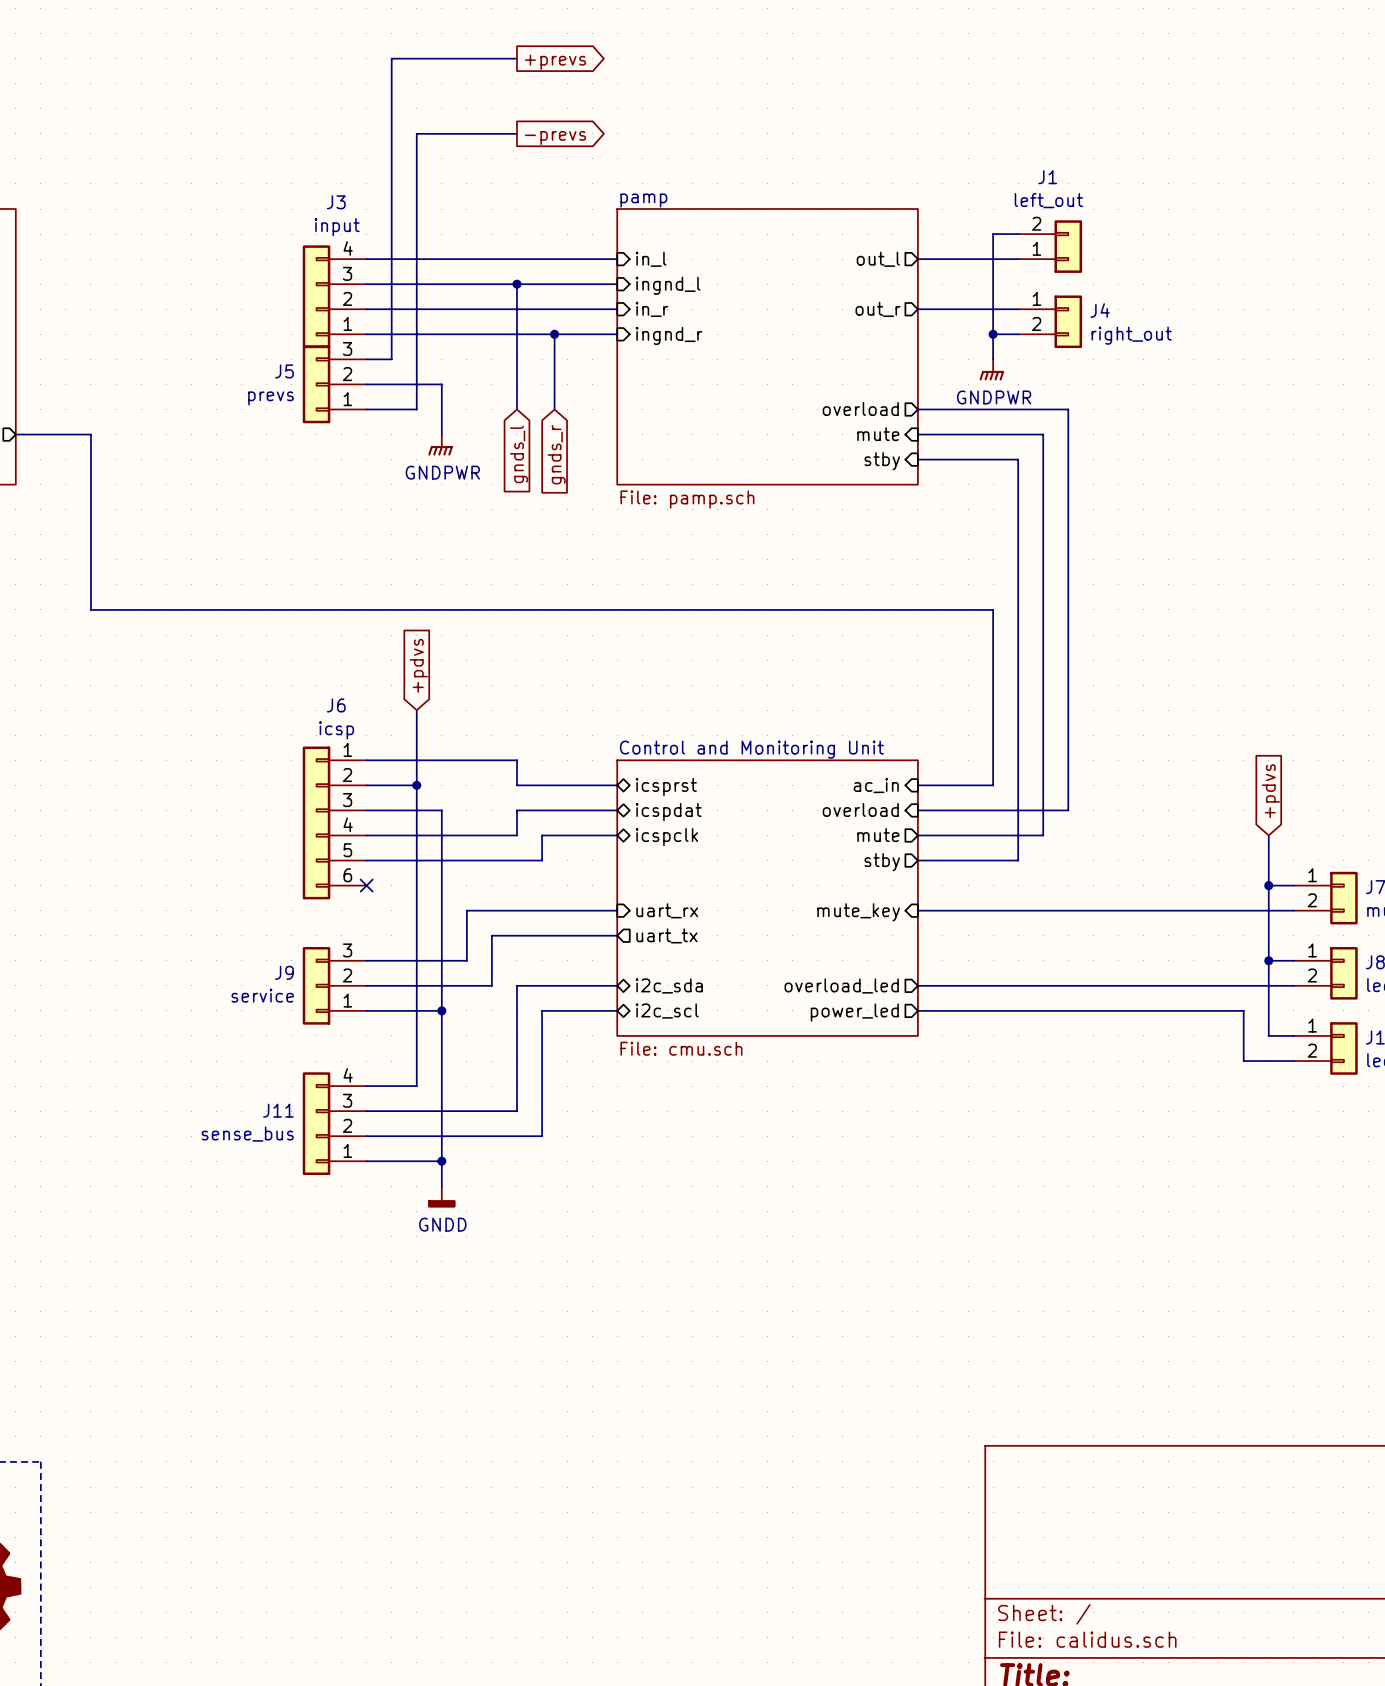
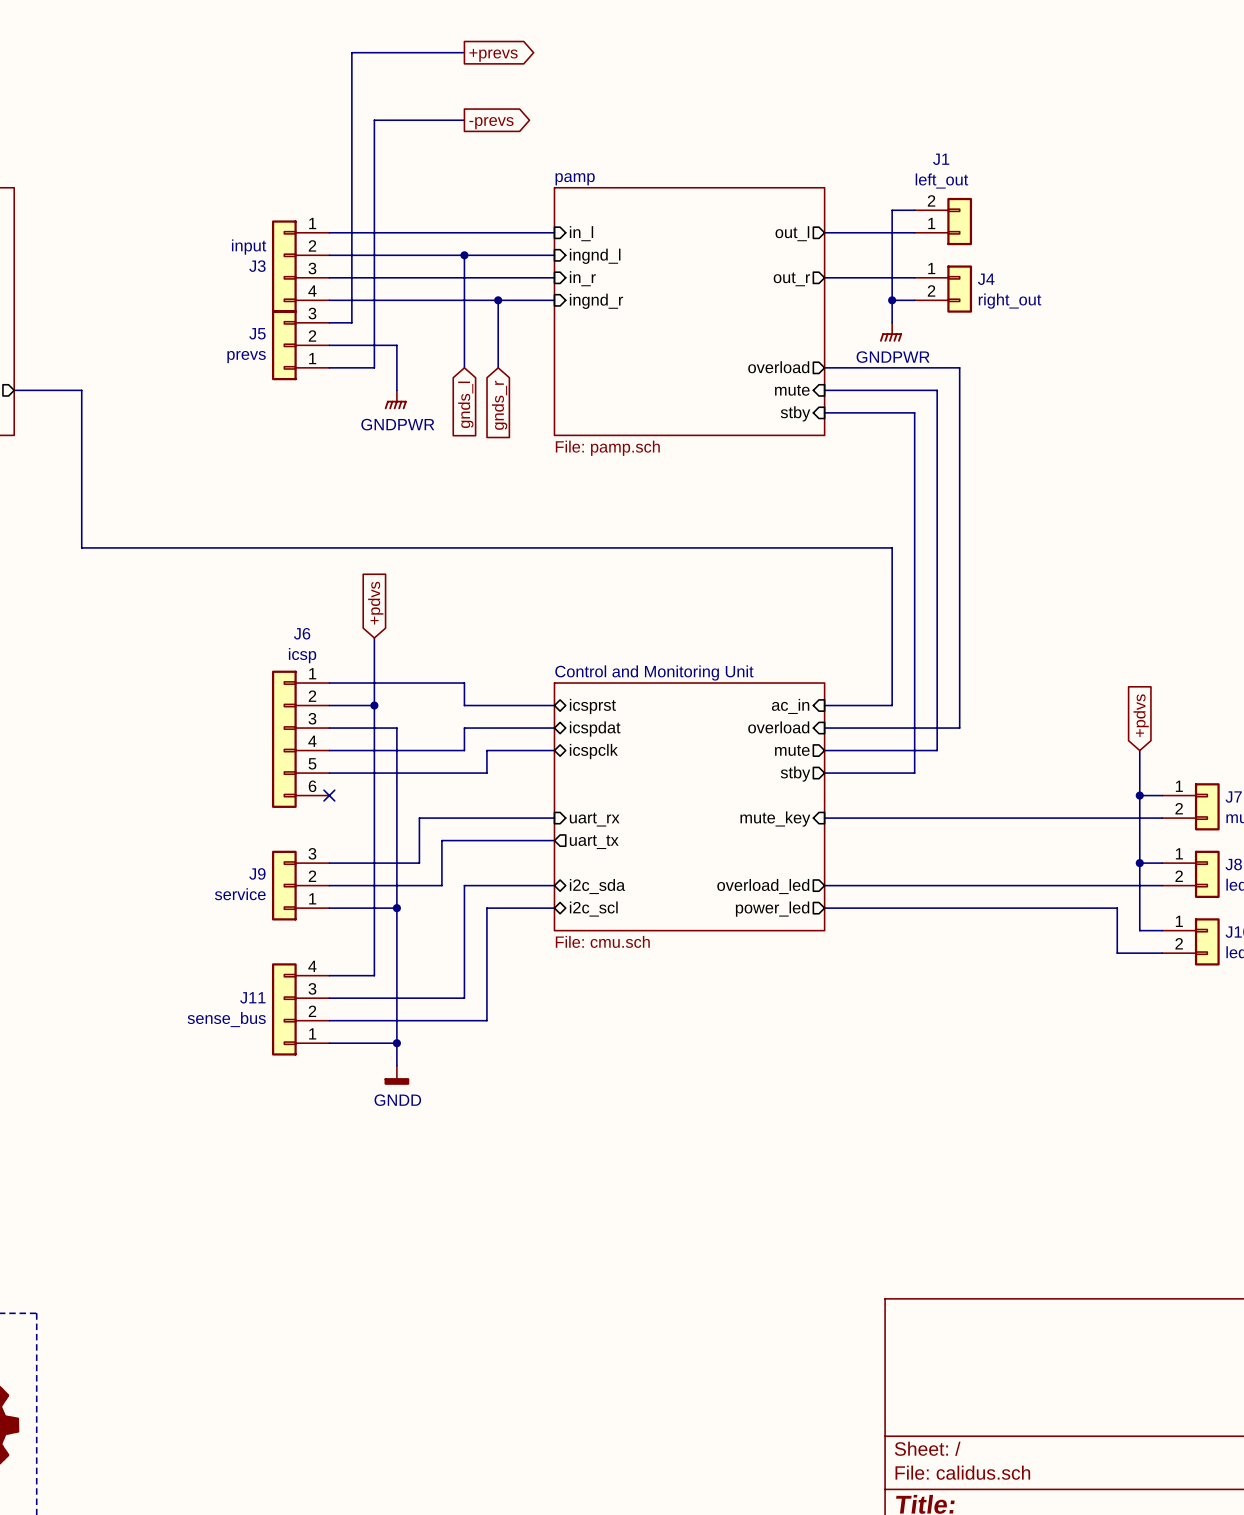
J3 name position: J3 (336, 202) -> J3 (257, 266)
J3 value position: input (337, 227) -> input (249, 247)
J3 flip: as is (316, 296) -> up-down (284, 266)

